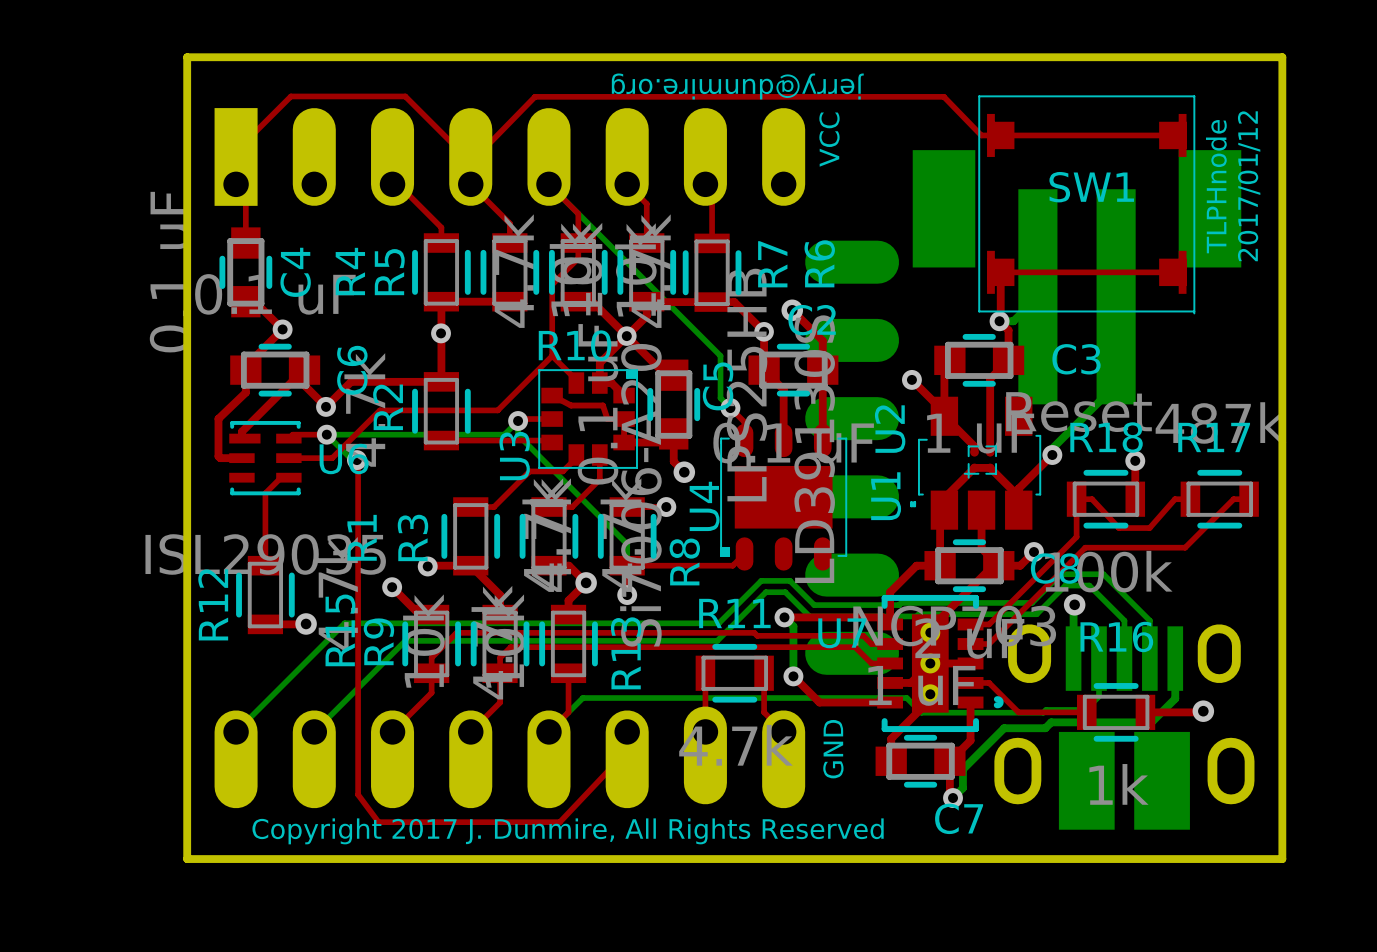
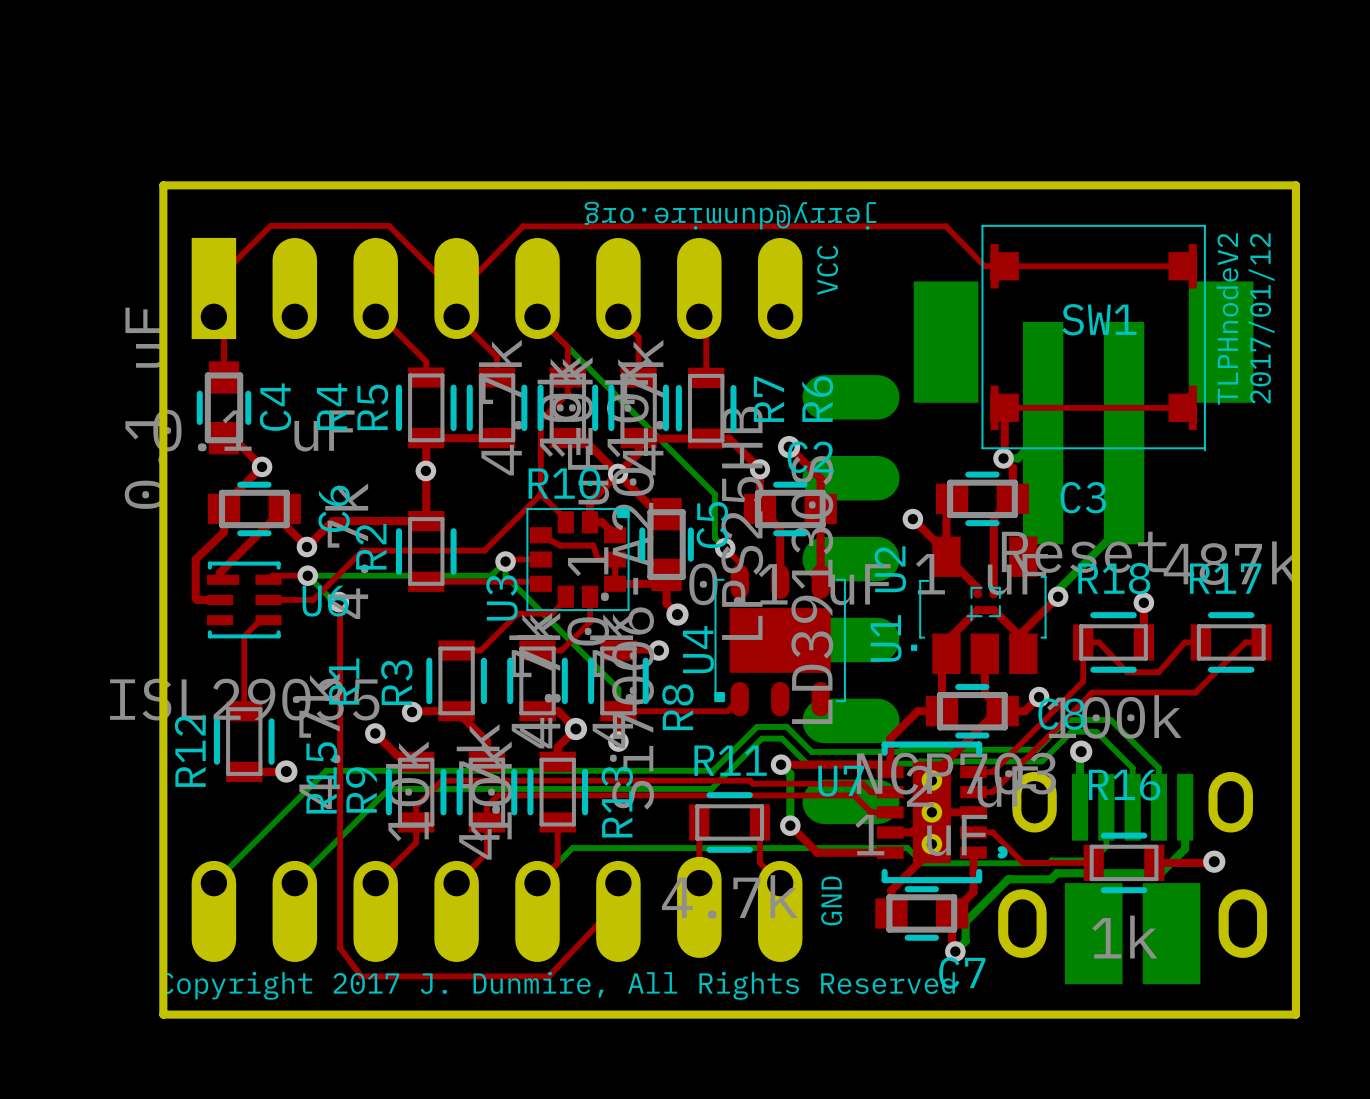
text: TLPHnode (1216, 186) -> TLPHnodeV2 (1227, 318)

